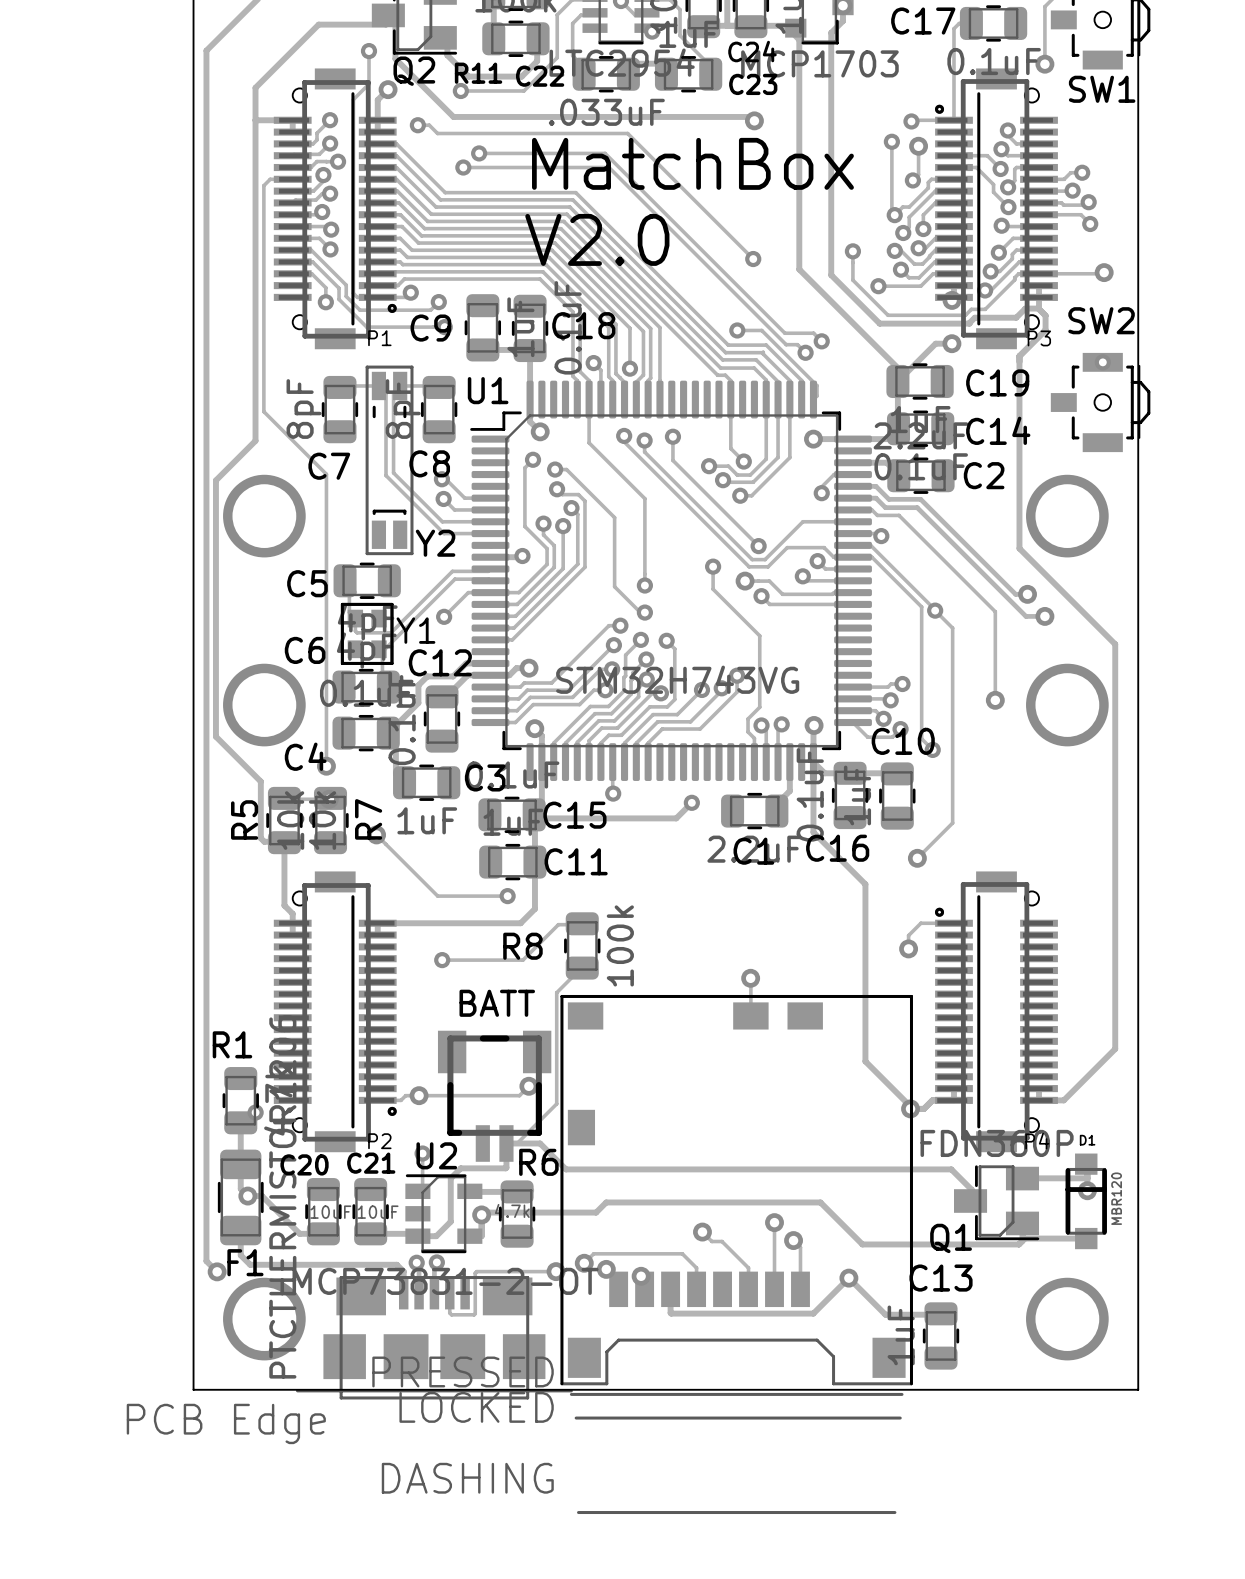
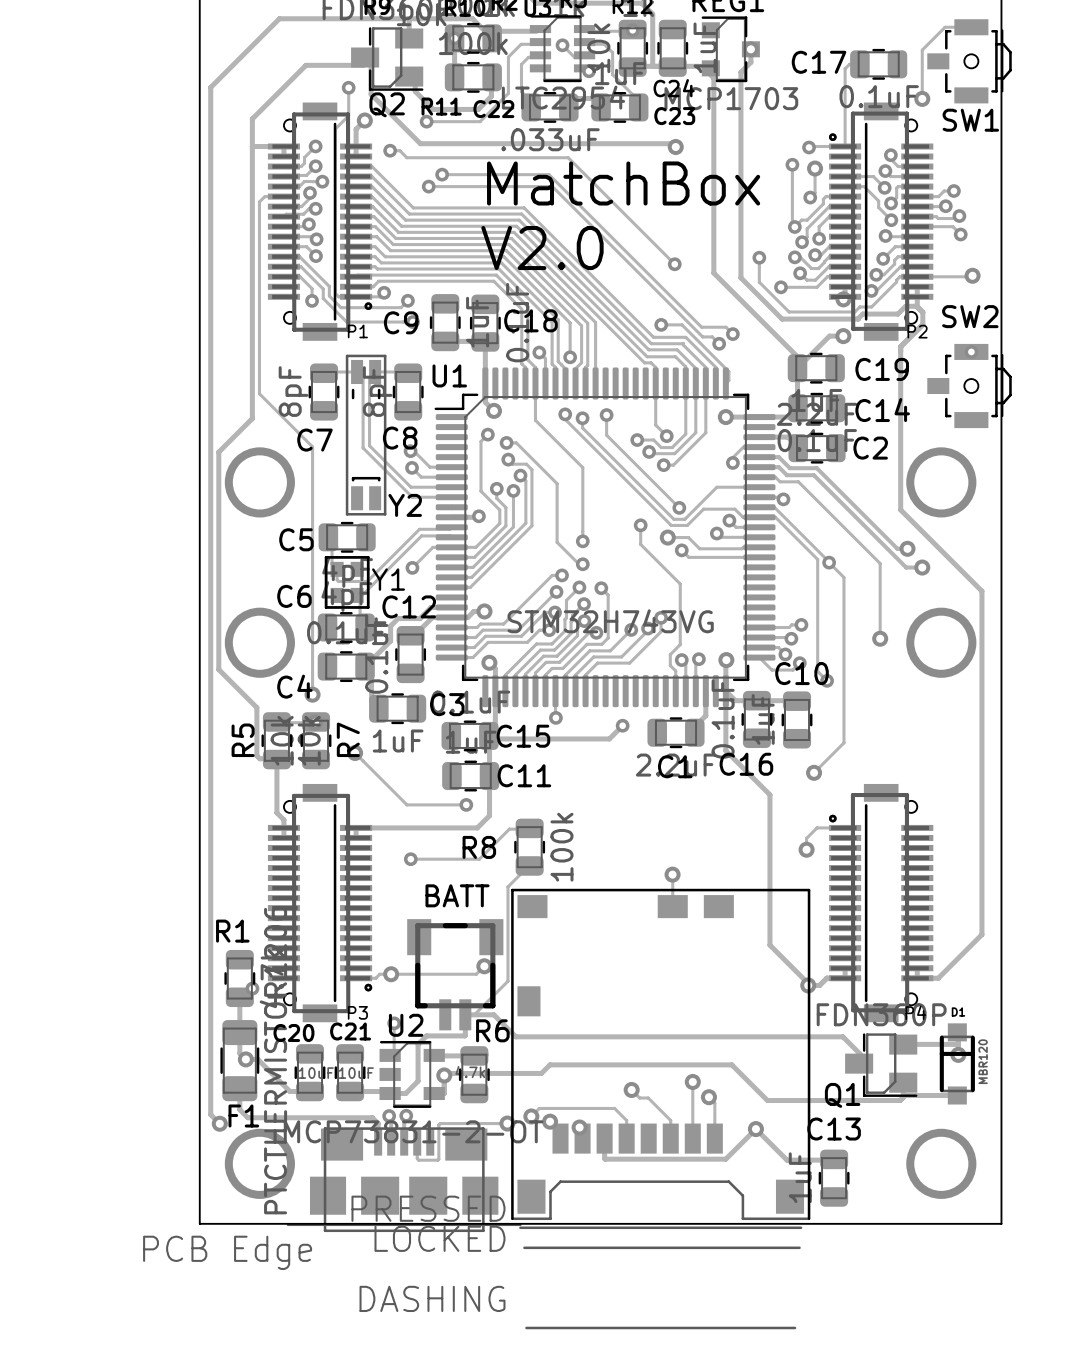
P3 name: P3 (1039, 338) -> P2 (917, 331)
P2 name: P2 (379, 1141) -> P3 (357, 1012)

